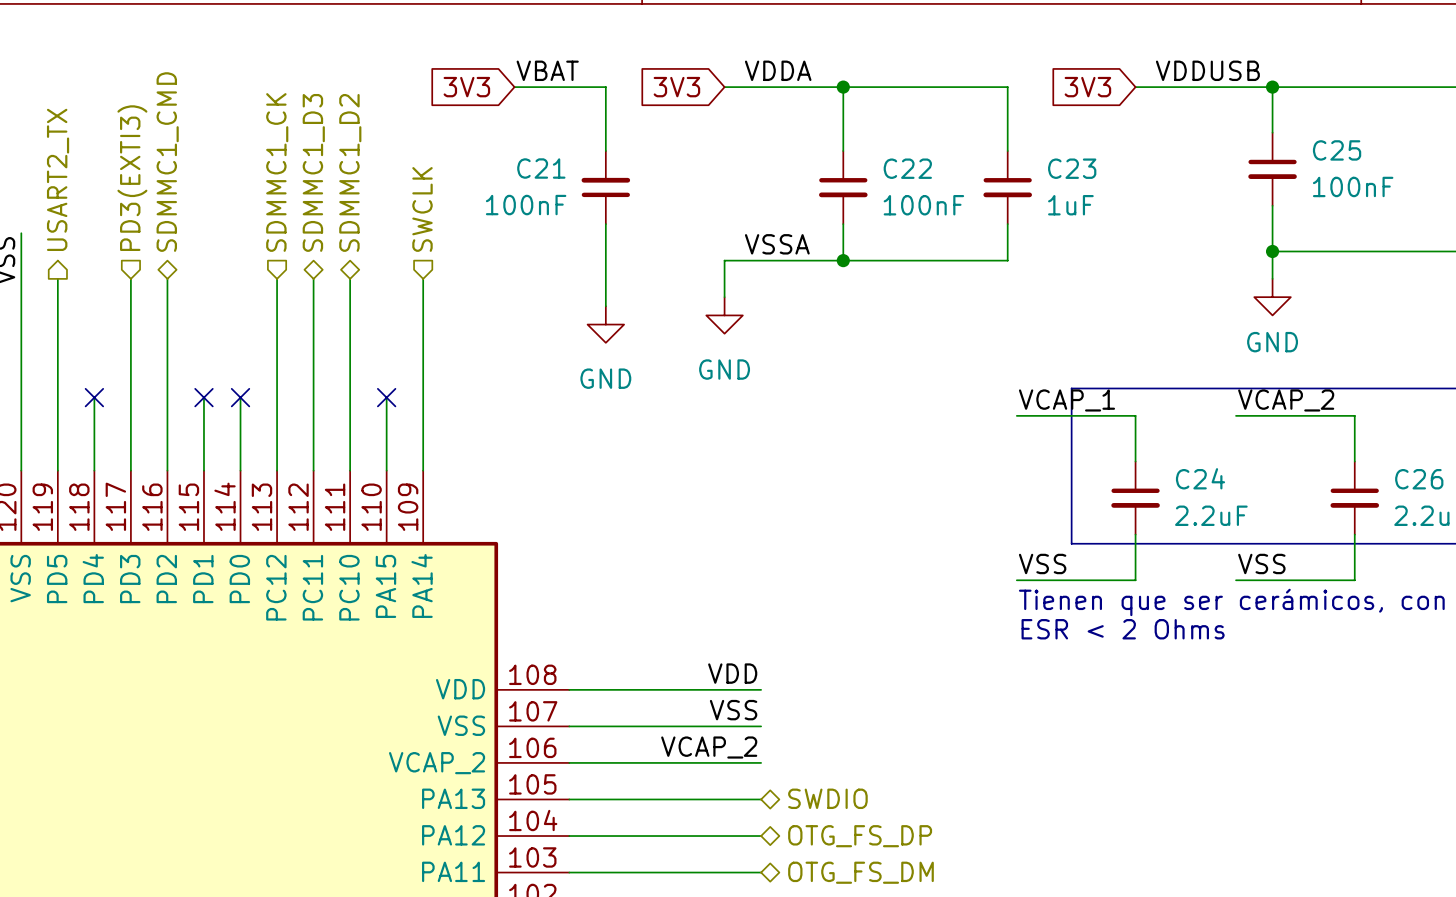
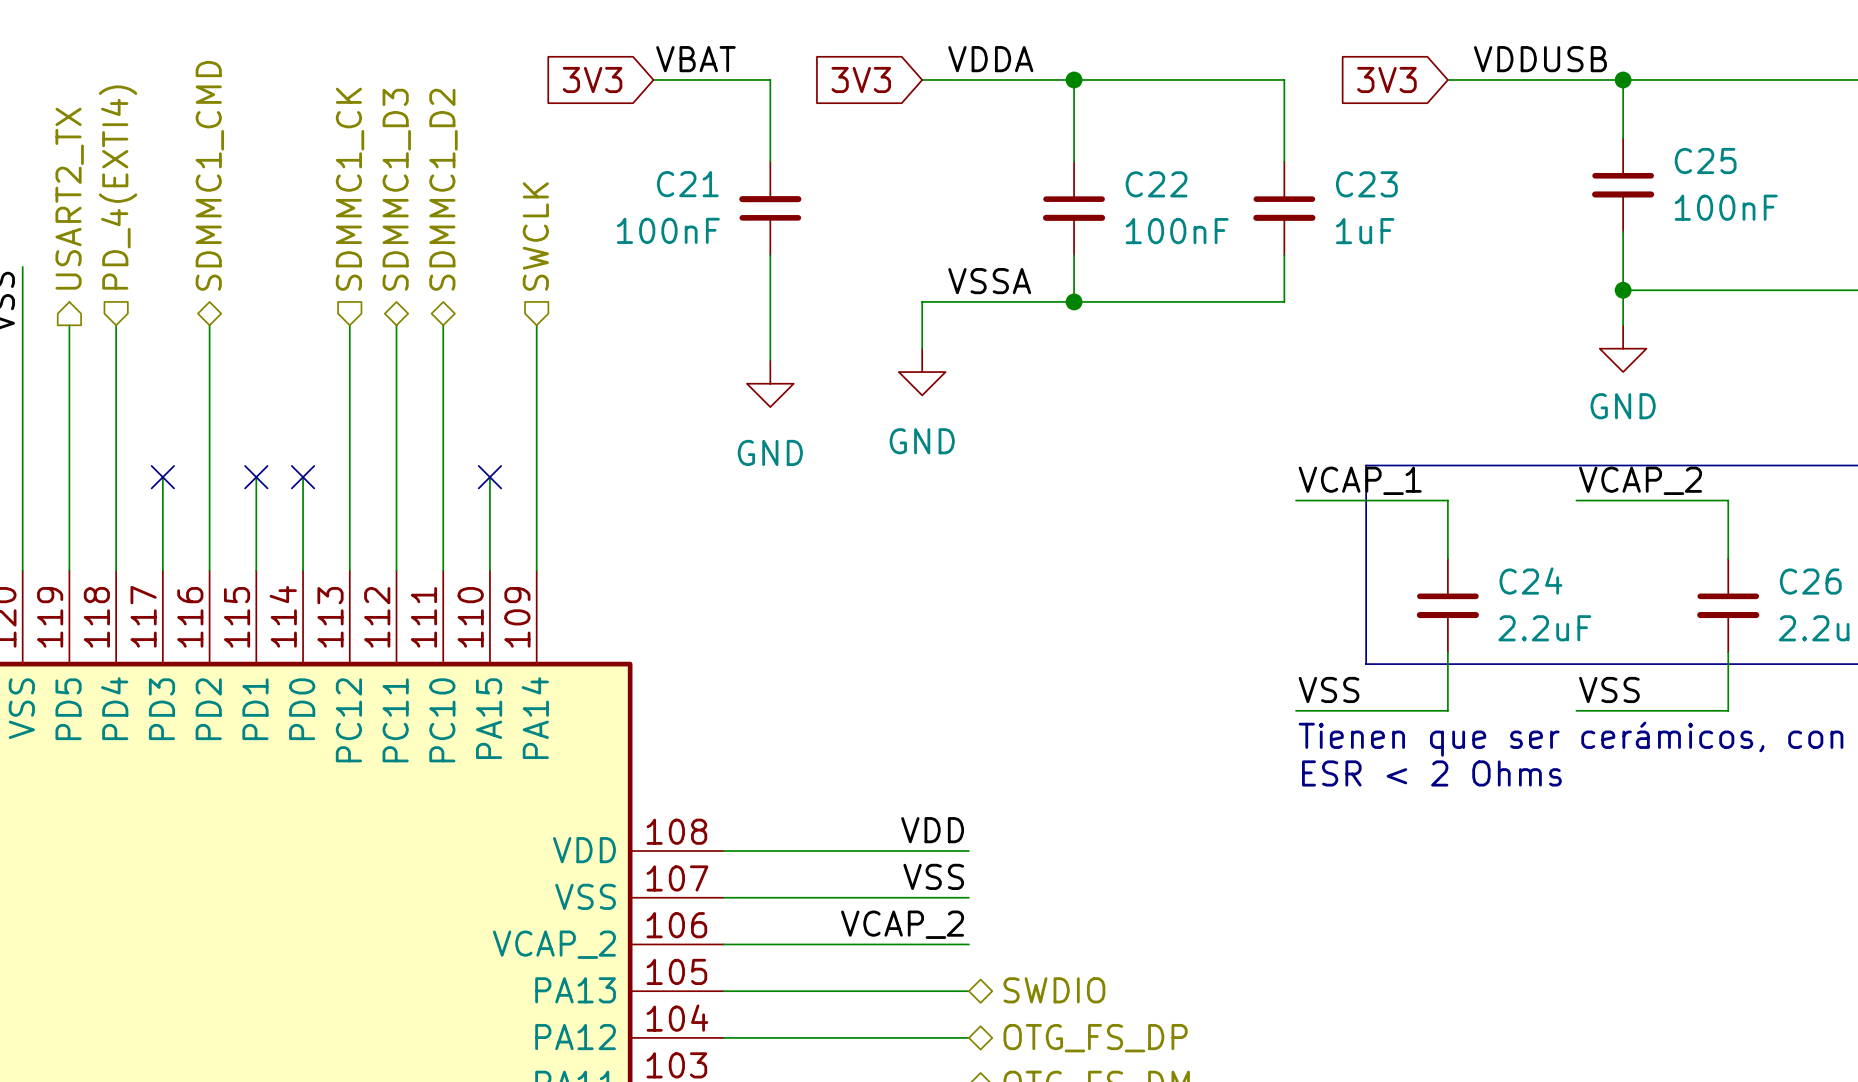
hierarchical label: PD3(EXTI3) (132, 178) -> PD_4(EXTI4) (118, 187)
wire: (130, 278) (130, 397) -> (116, 325) (116, 477)
no-connect mark position: (94, 397) -> (162, 477)

